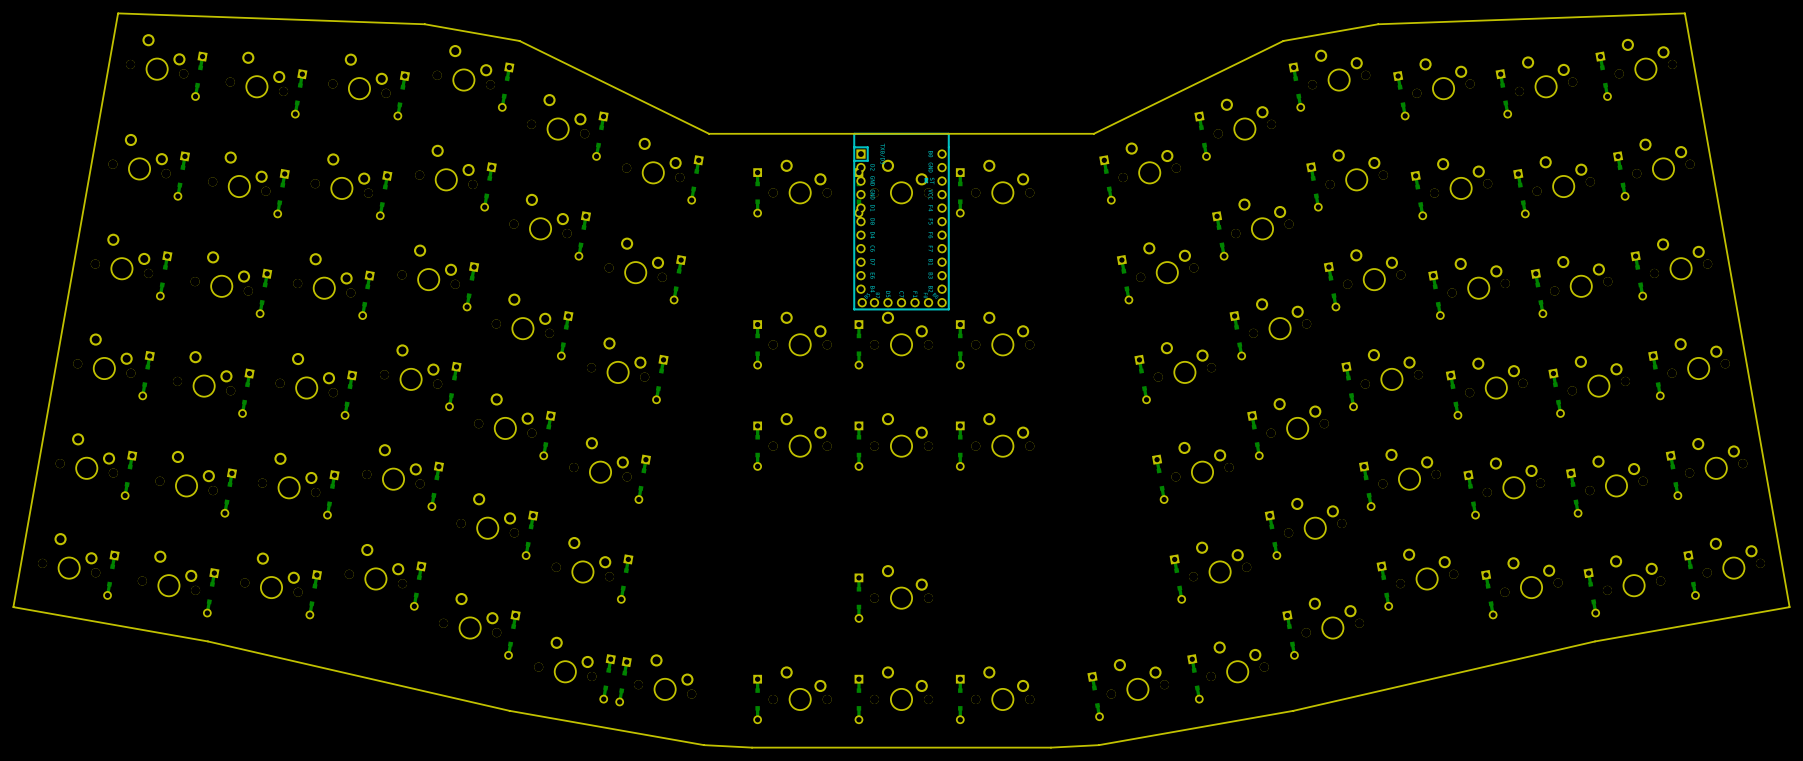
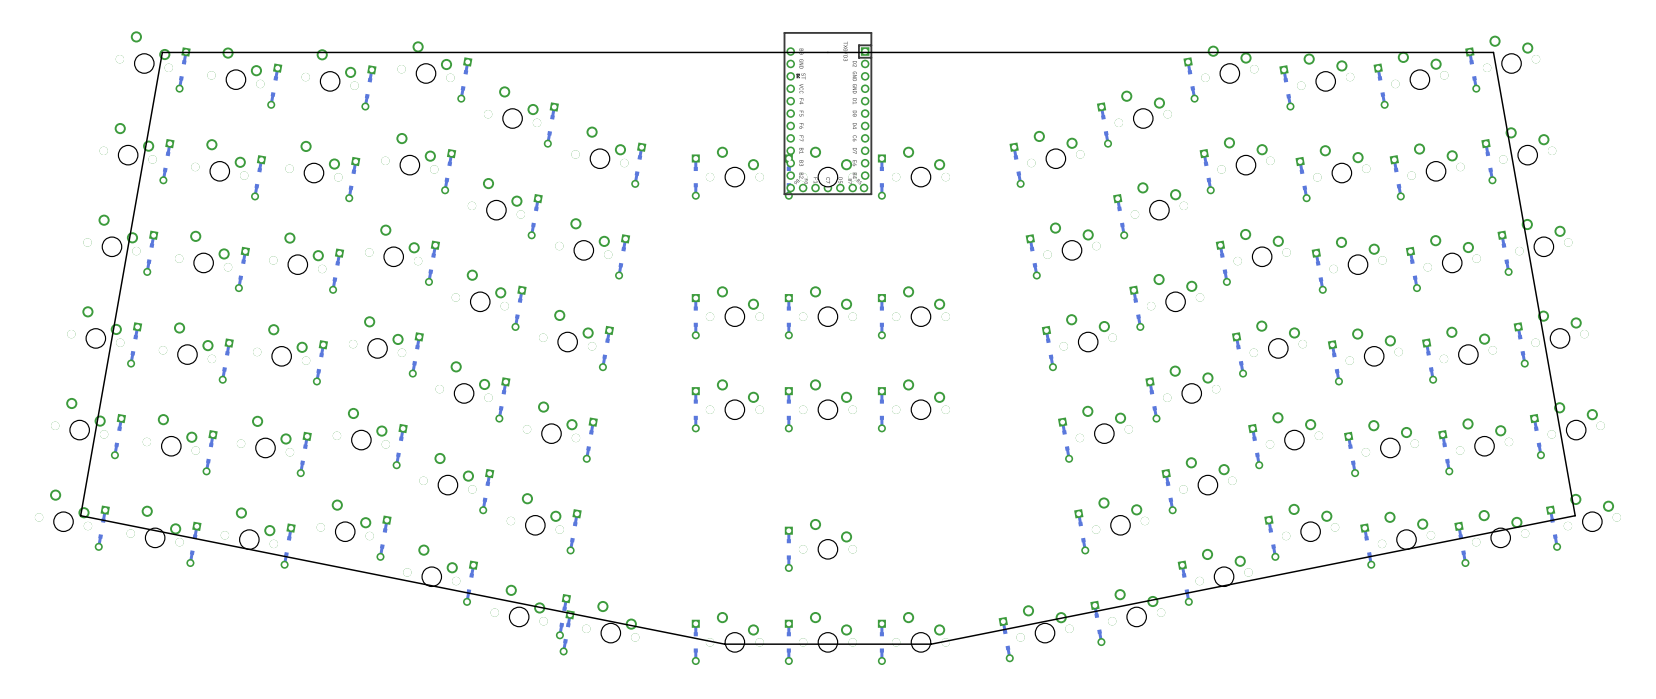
board edge: (1684, 13) (1378, 24) (1283, 40) (1093, 133) (709, 133) (519, 40) (424, 24) (118, 13) (13, 607) (207, 641) (509, 710) (704, 745) (752, 747) (1050, 747) (1098, 745) (1293, 710) (1595, 641) (1789, 607) (1684, 13) -> (1493, 52) (1575, 515) (931, 644) (724, 644) (80, 515) (162, 52) (1493, 52)
part: none -> (827, 113)
part: (901, 221) -> none
part: none -> (563, 616)
part: (607, 678) -> none
part: (623, 681) -> none
part: none -> (567, 632)

